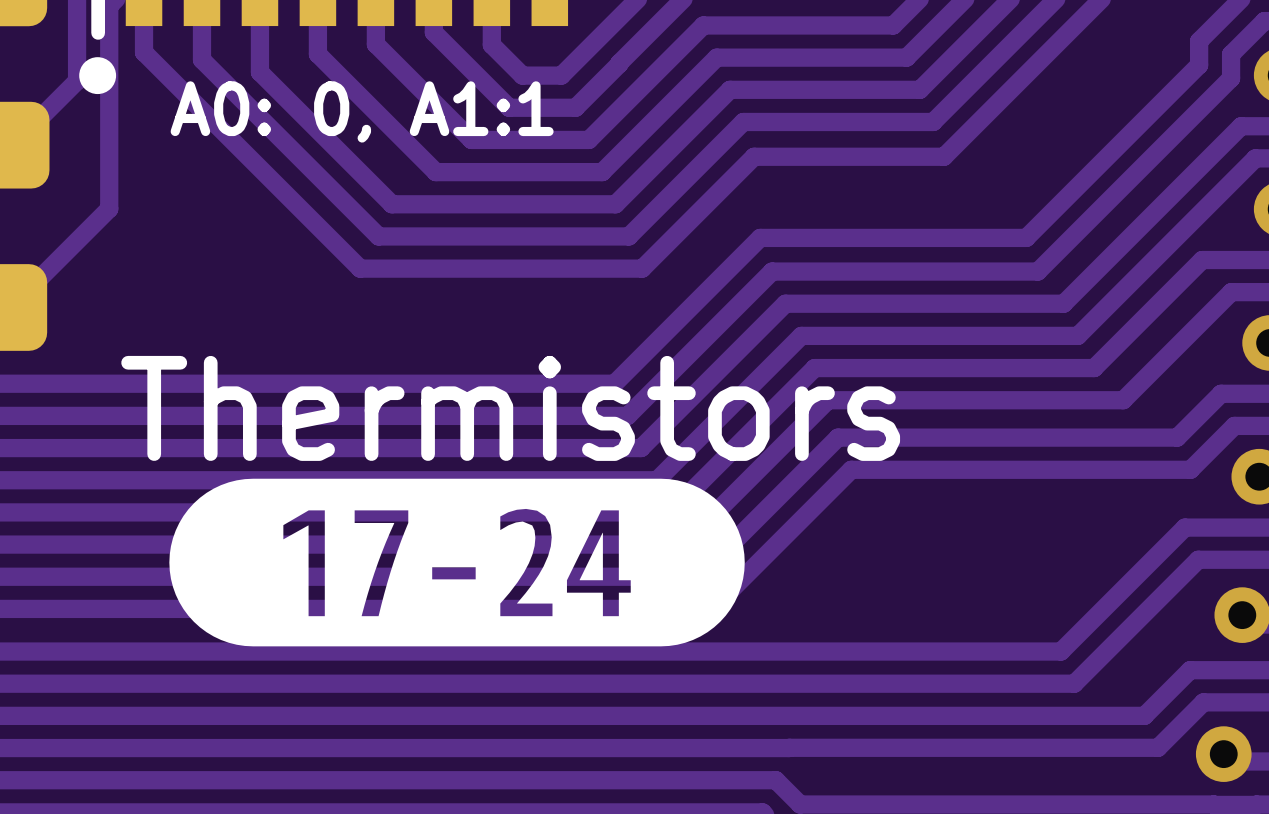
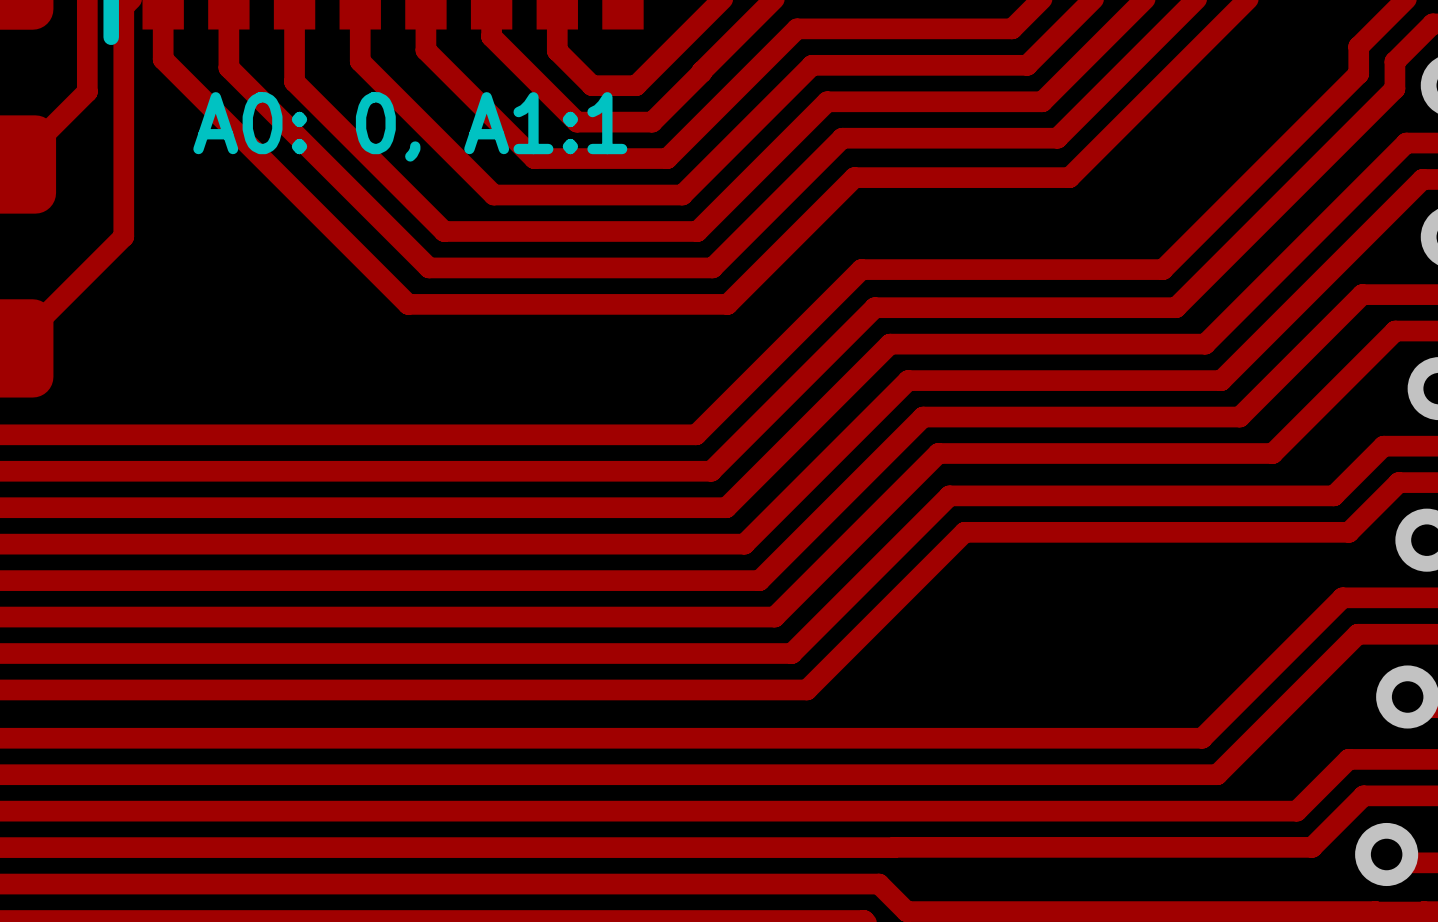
drawing: [79, 57, 117, 95] -> none
text: Thermistors (510, 408) -> none
drawing: [169, 478, 745, 647] -> none

